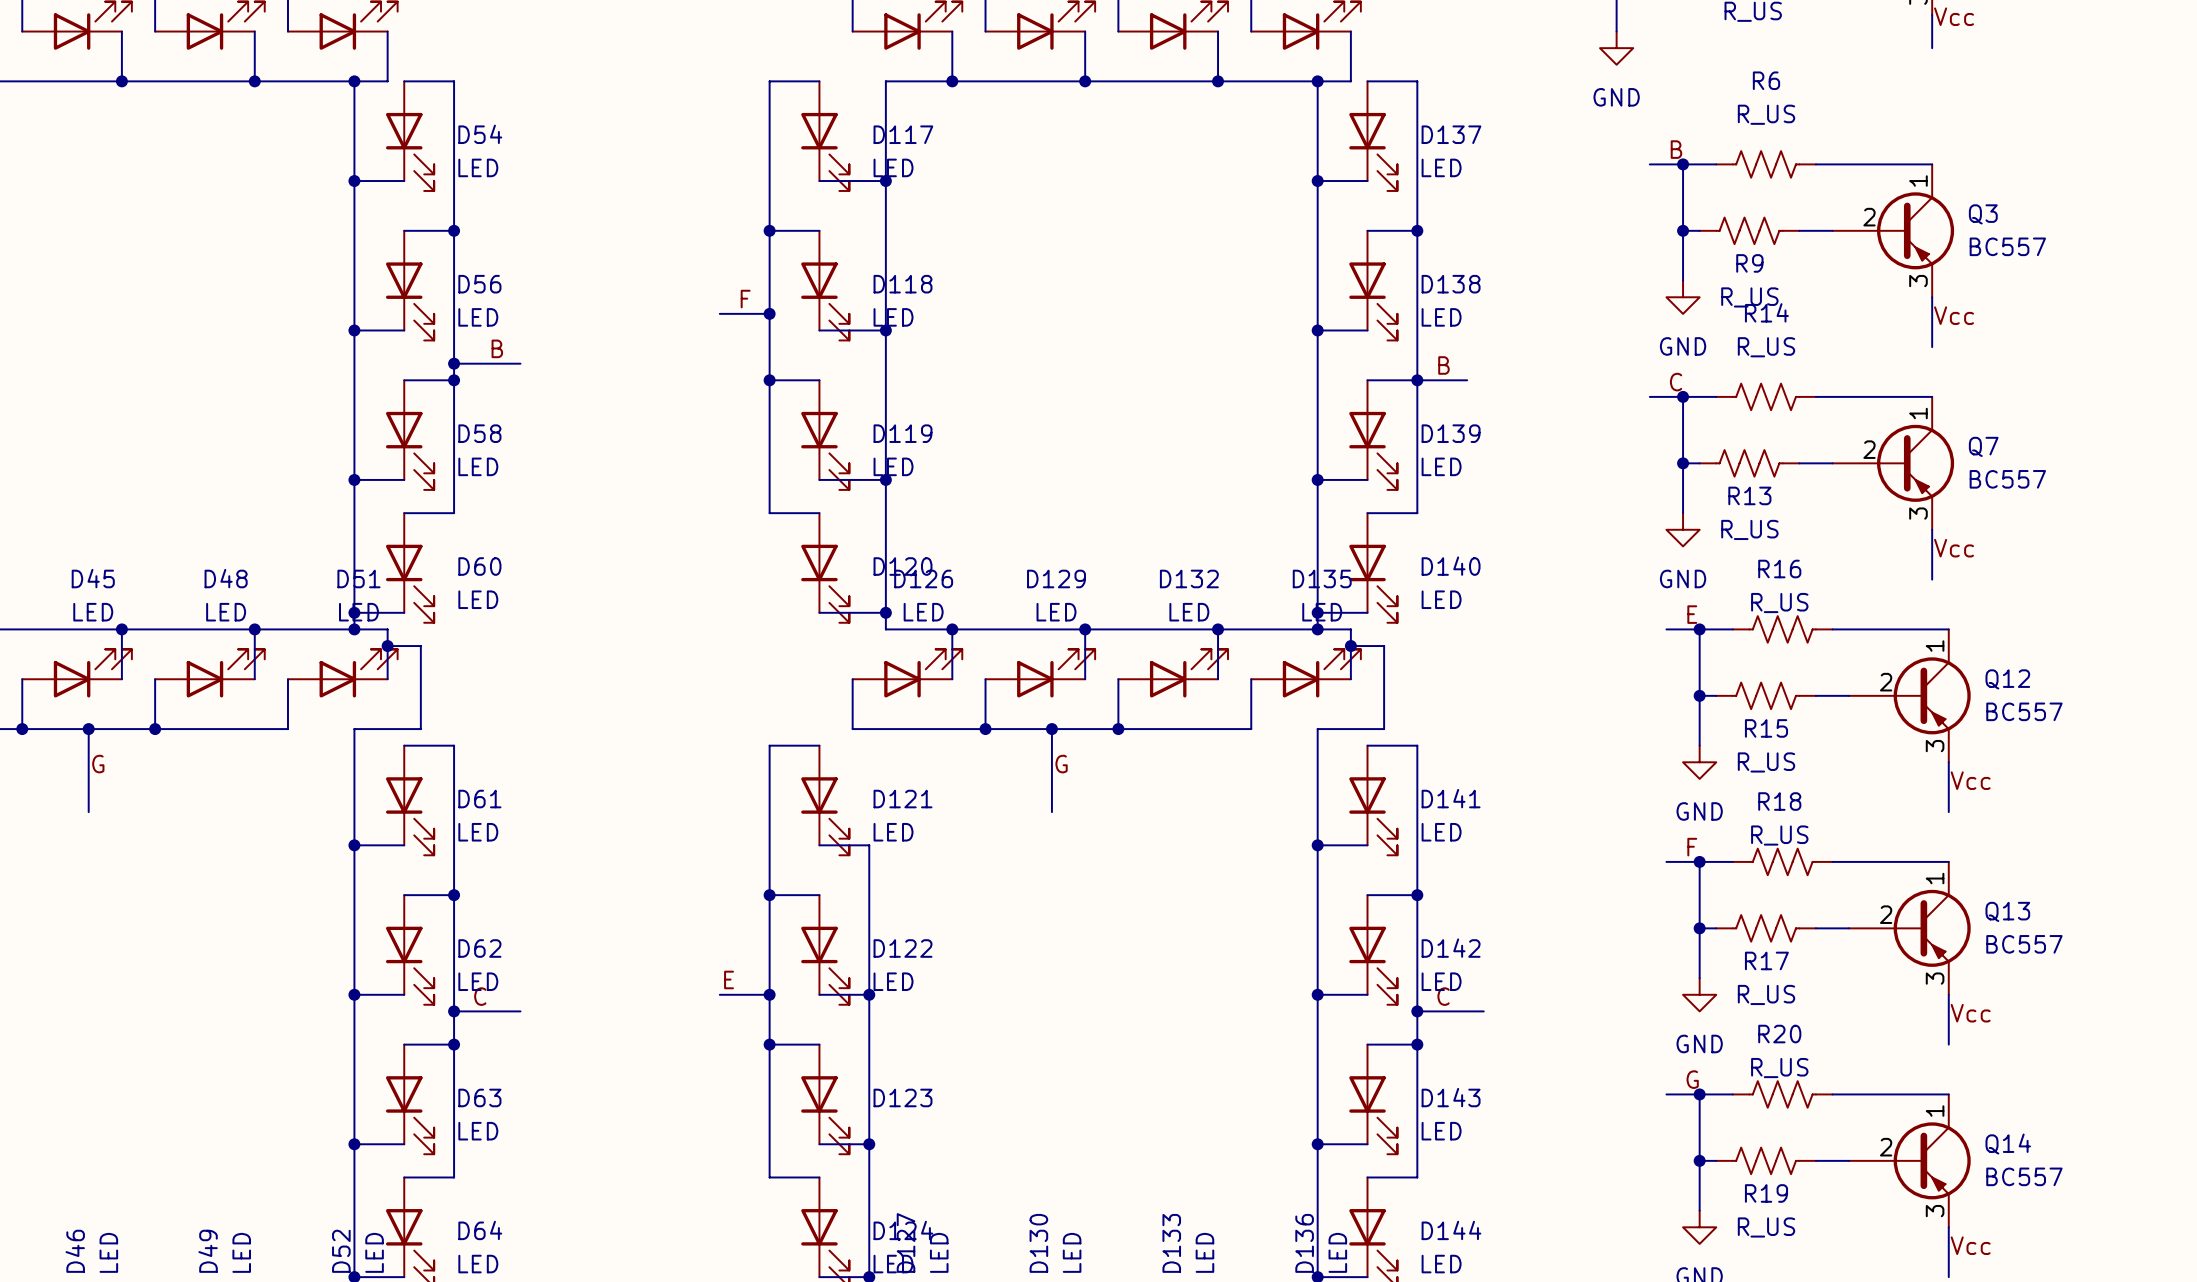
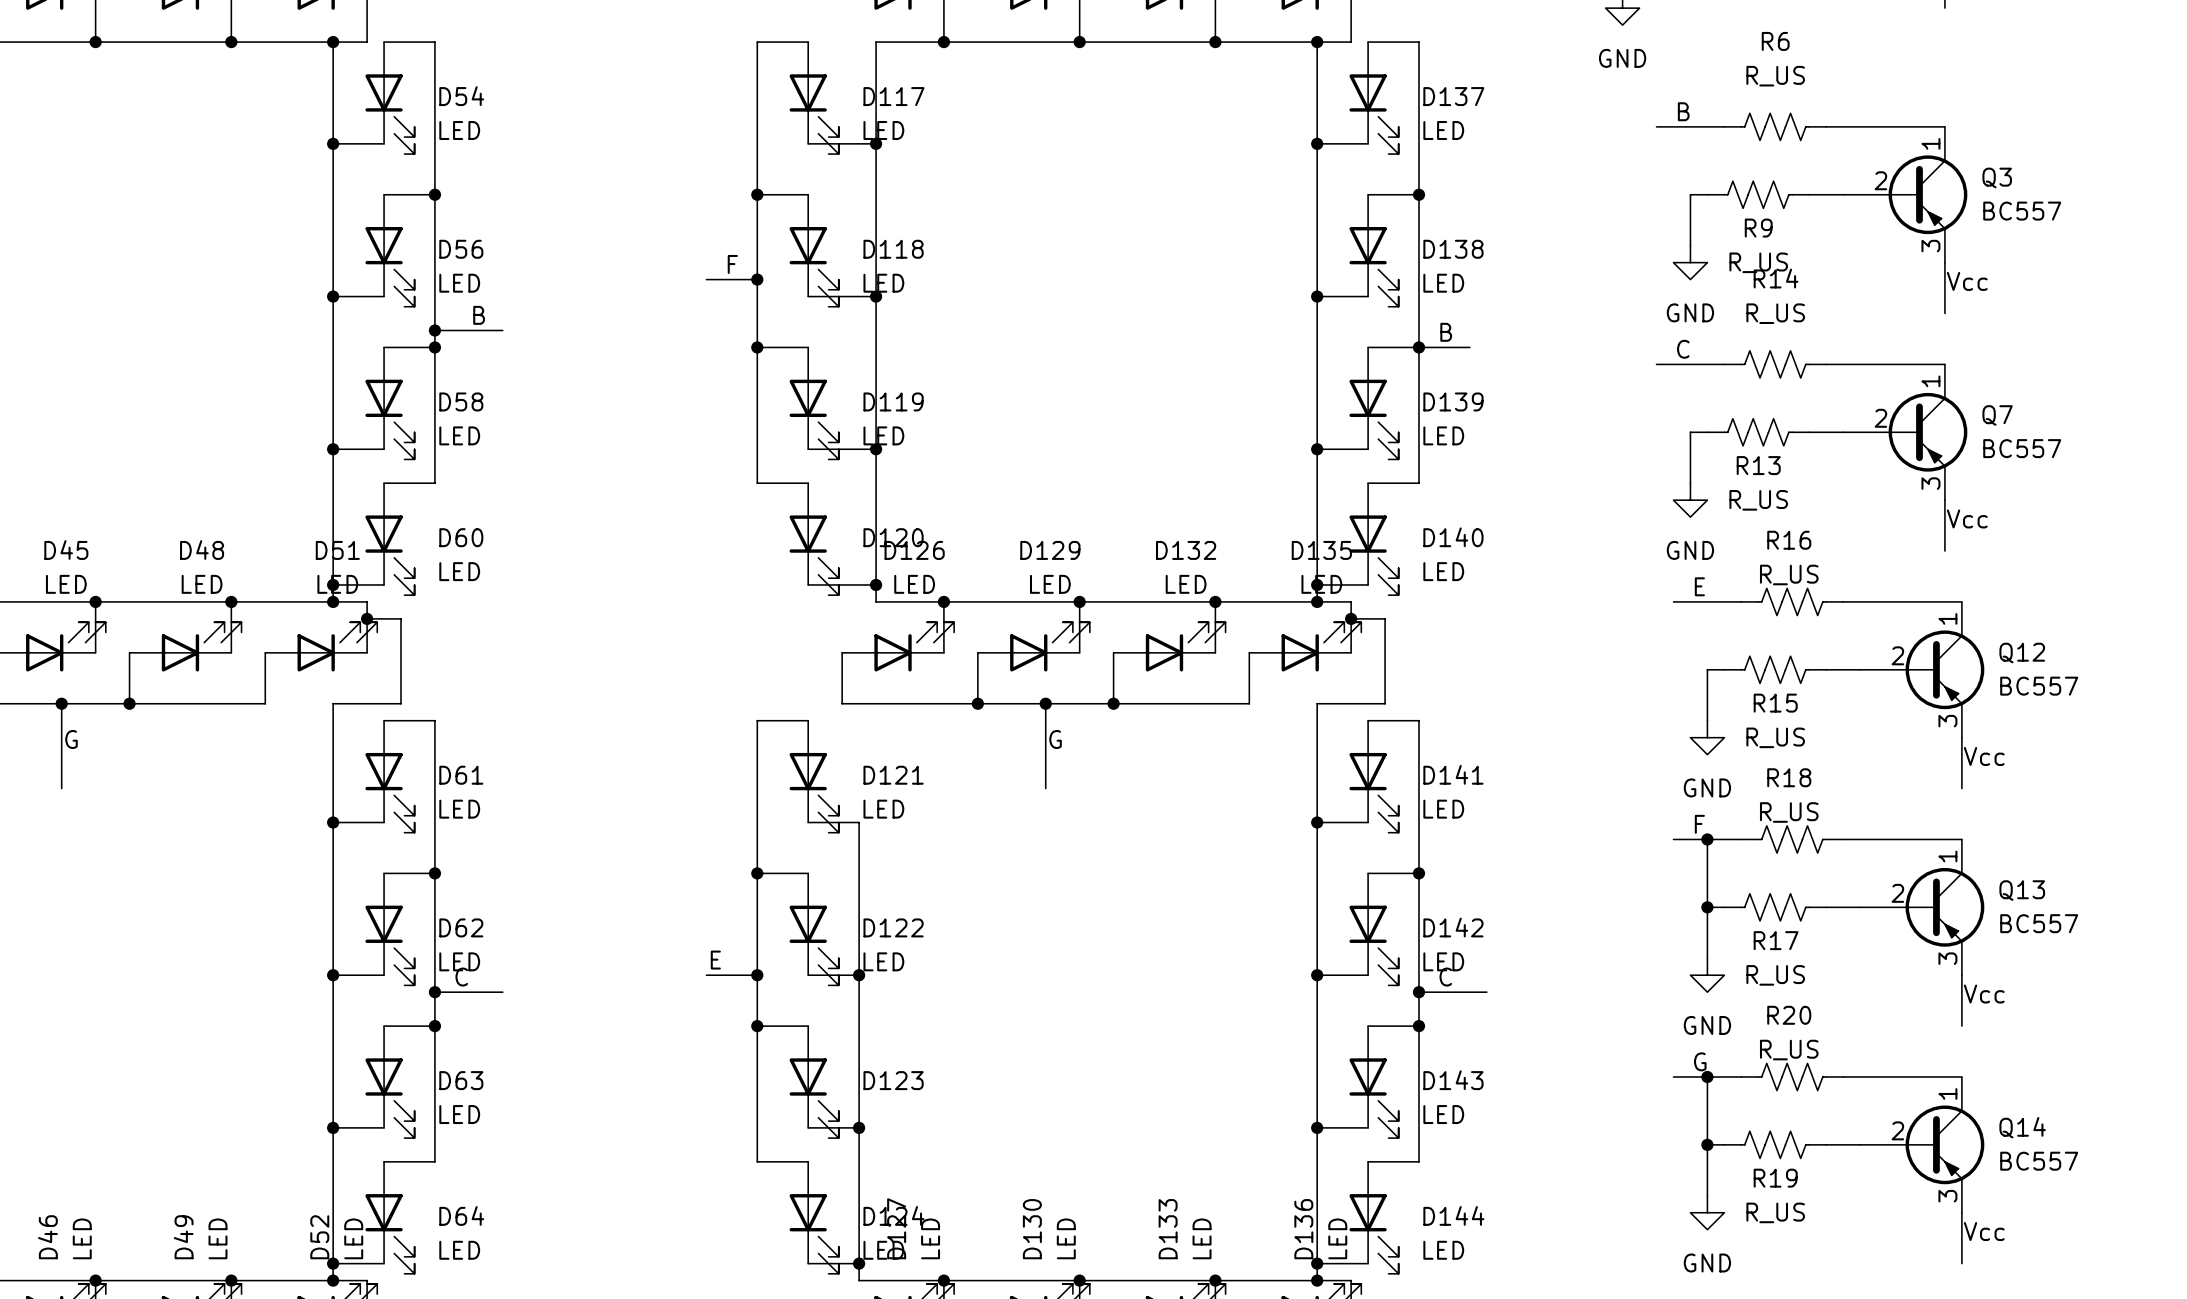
wire: (1683, 164) (1683, 230) -> none
junction: (1683, 164) -> none
junction: (1683, 230) -> none
wire: (1683, 396) (1683, 463) -> none
junction: (1683, 396) -> none
junction: (1683, 463) -> none
wire: (1699, 629) (1699, 695) -> none
junction: (1699, 629) -> none
junction: (1699, 695) -> none

